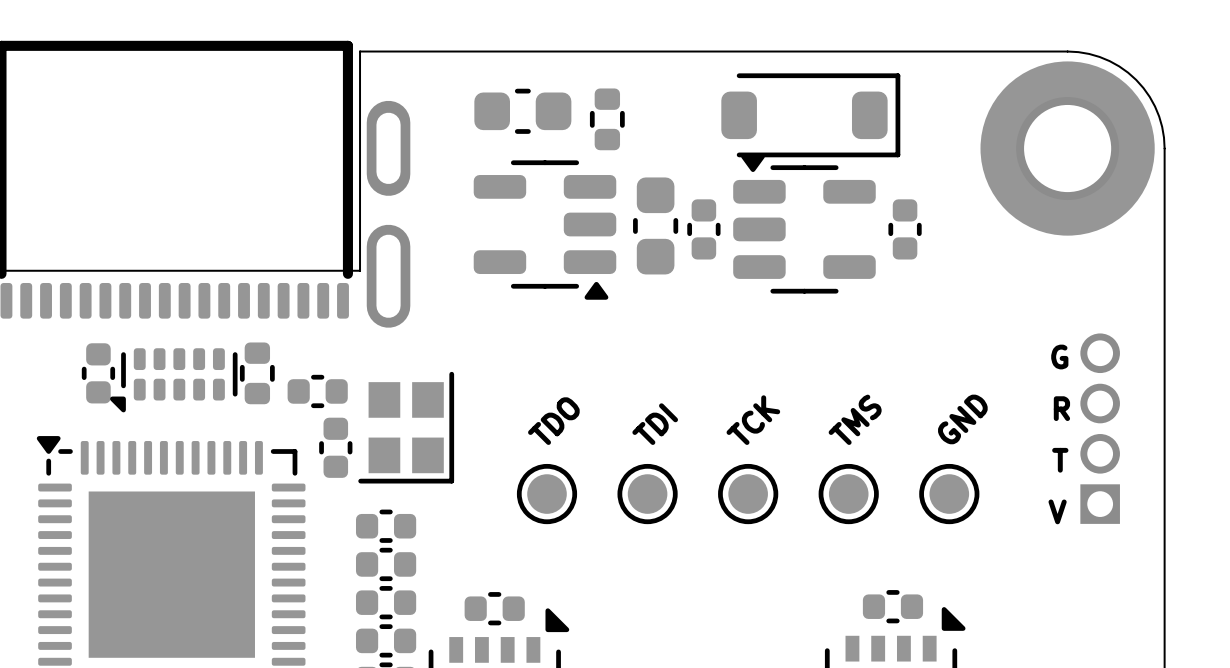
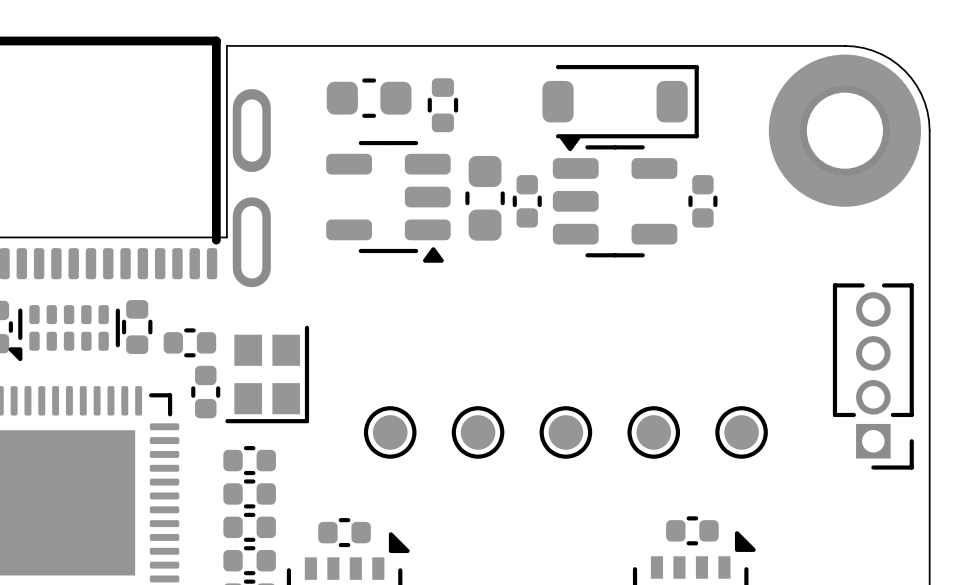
part footprint: [1080, 333, 1120, 524] -> [832, 283, 914, 470]
text: G (1059, 357) -> none
text: R (1061, 408) -> none
text: TMS (855, 419) -> none
text: GND (962, 419) -> none
text: TCK (753, 420) -> none
text: TDO (553, 421) -> none
text: TDI (655, 424) -> none
text: T (1060, 460) -> none
text: V (1057, 511) -> none

